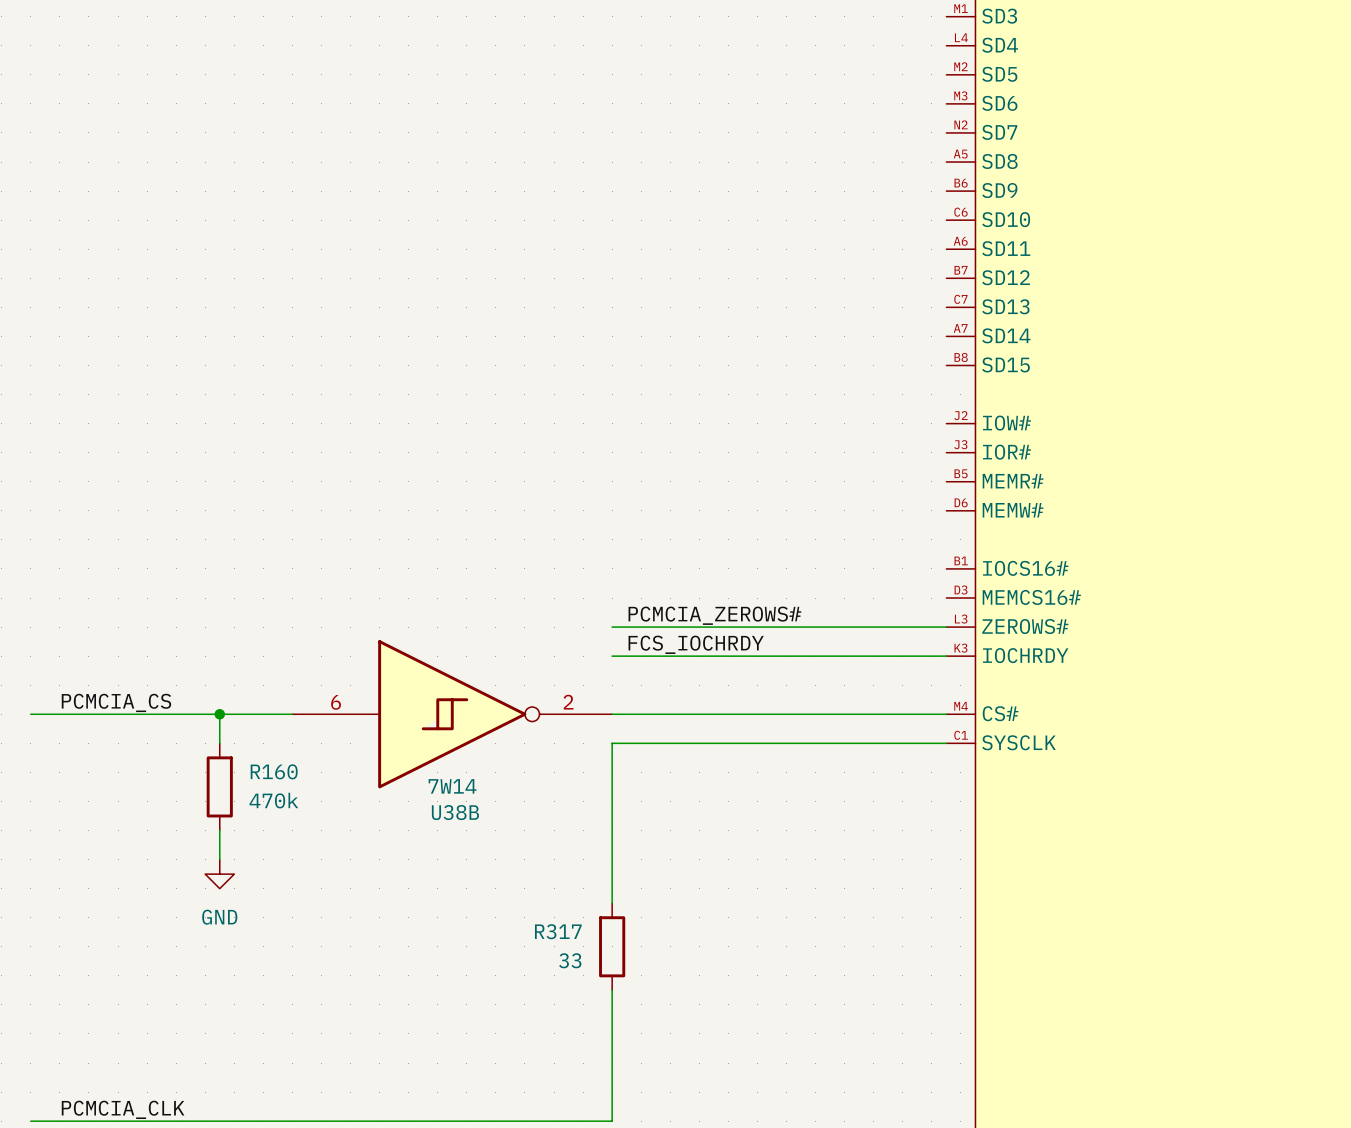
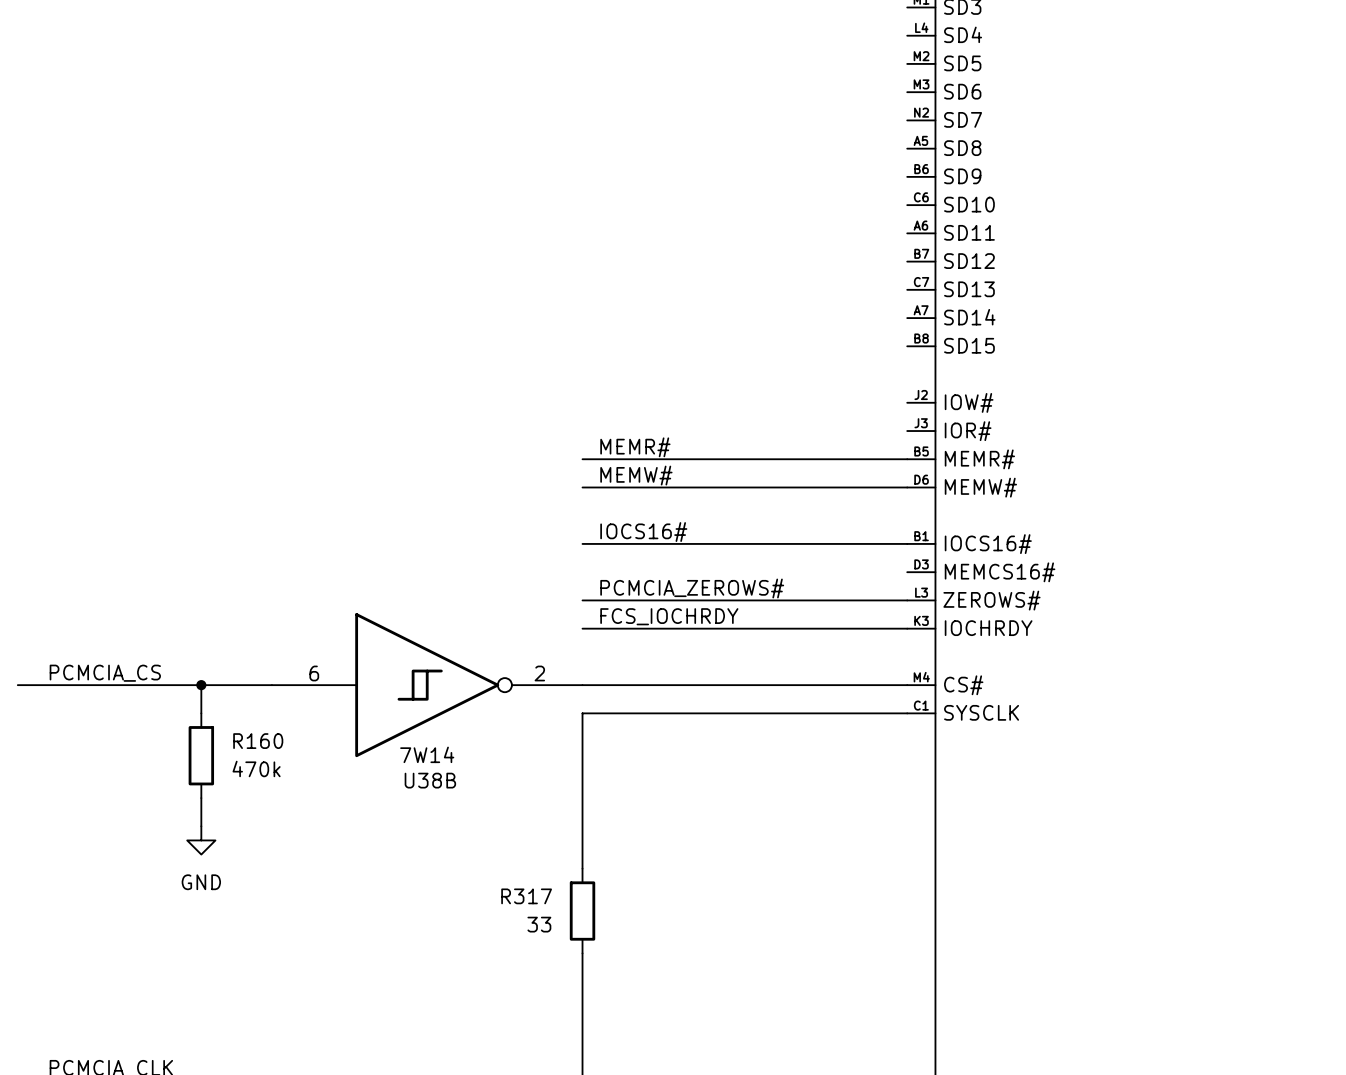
label: none -> MEMR# (635, 447)
wire: none -> (582, 459) (907, 459)
label: none -> MEMW# (636, 475)
wire: none -> (582, 487) (907, 487)
label: none -> IOCS16# (643, 532)
wire: none -> (582, 543) (907, 543)

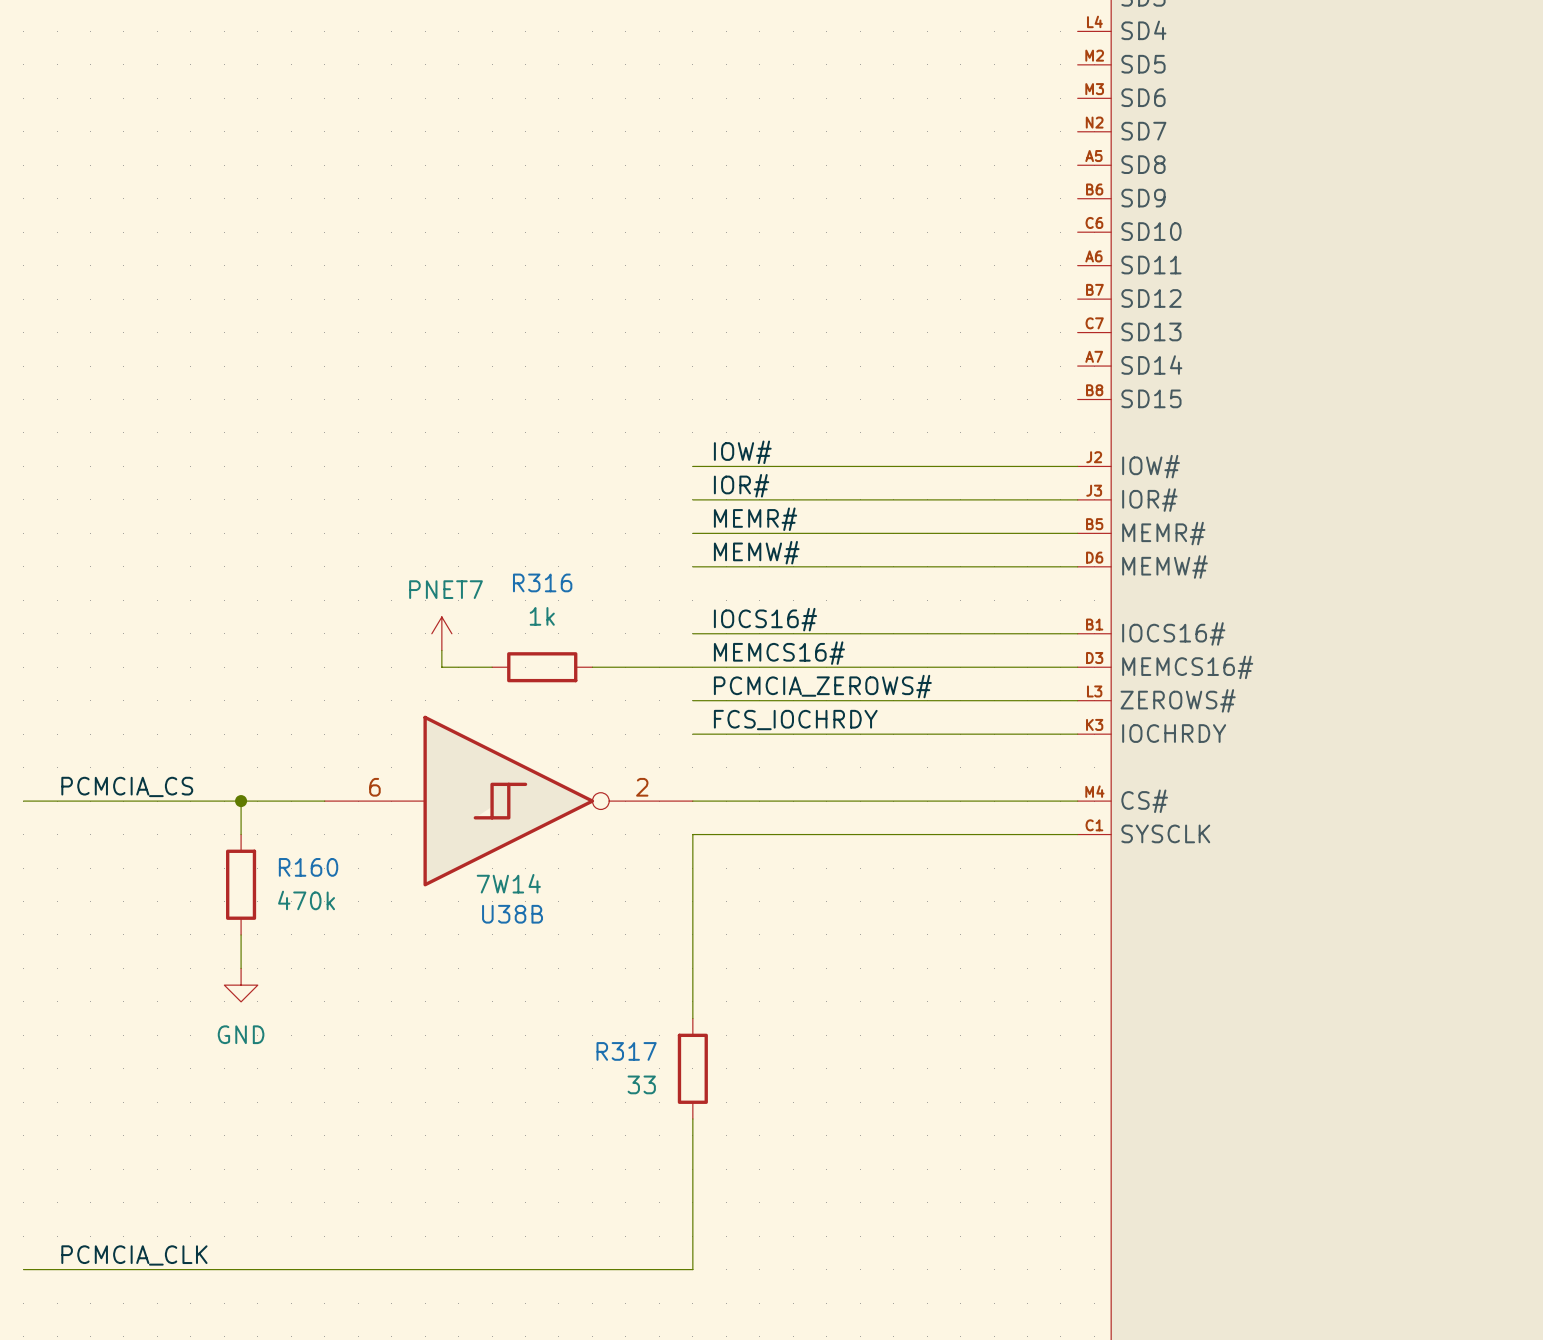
label: none -> IOW# (742, 452)
wire: none -> (692, 466) (1077, 466)
label: none -> IOR# (741, 485)
wire: none -> (692, 499) (1077, 499)
power symbol: none -> PNET7 (441, 633)
wire: none -> (441, 650) (441, 667) (492, 667)
label: none -> MEMCS16# (779, 653)
R316: none -> 1k (542, 667)
wire: none -> (592, 667) (1077, 667)

